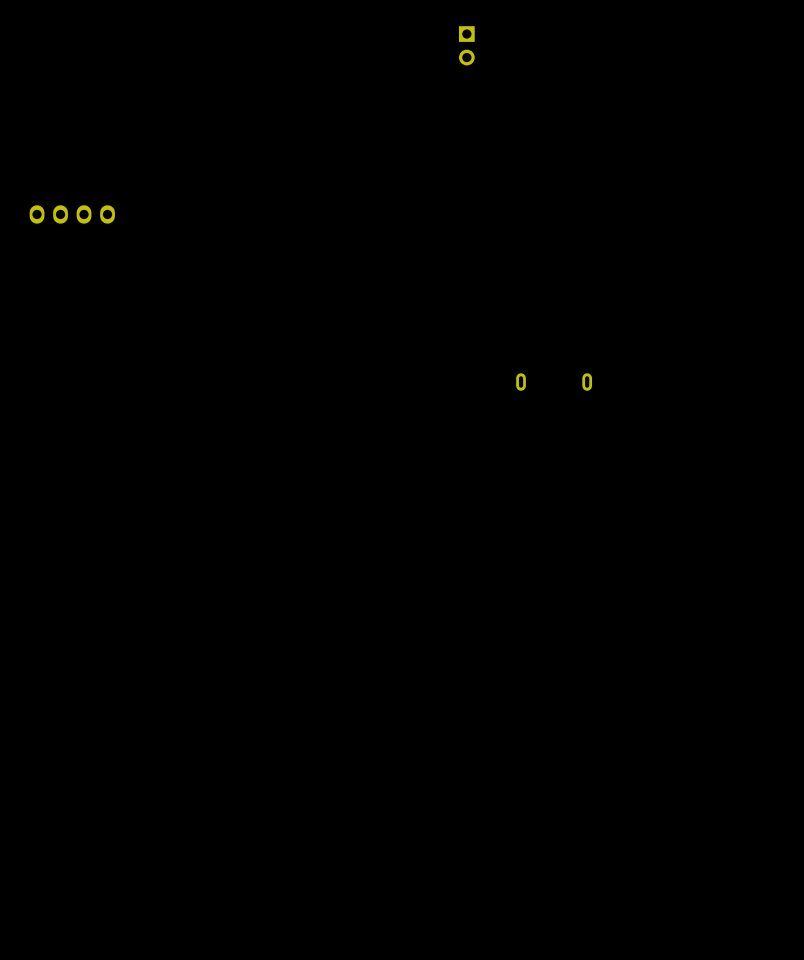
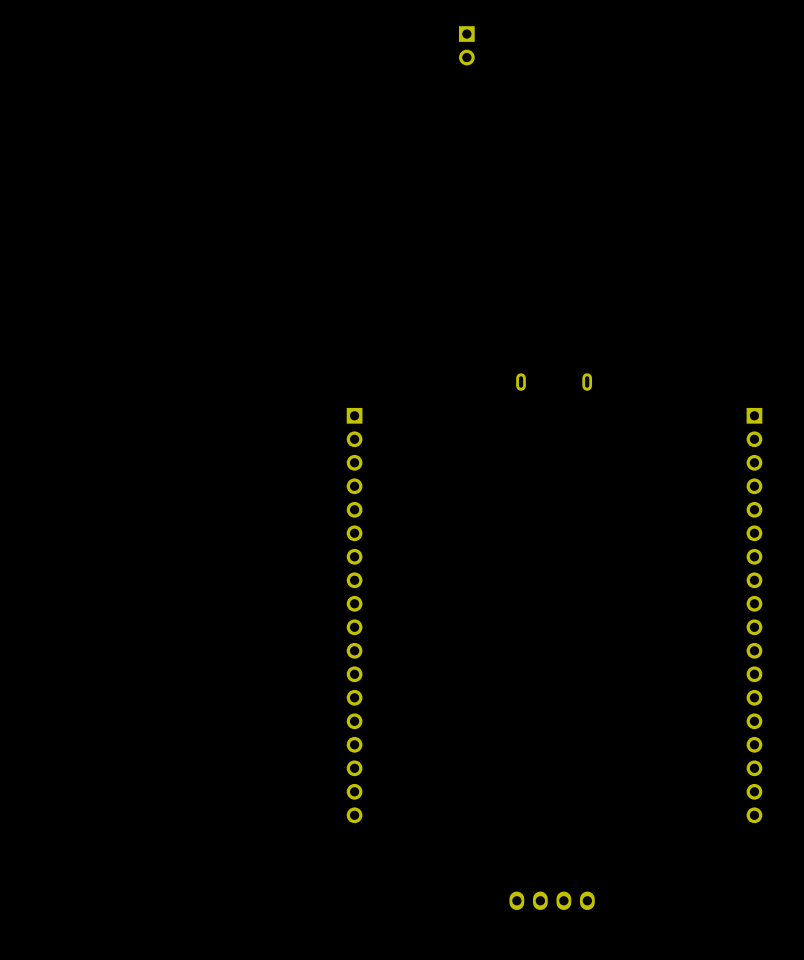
part: (72, 214) -> none
part: none -> (354, 615)
part: none -> (754, 615)
part: none -> (552, 900)

